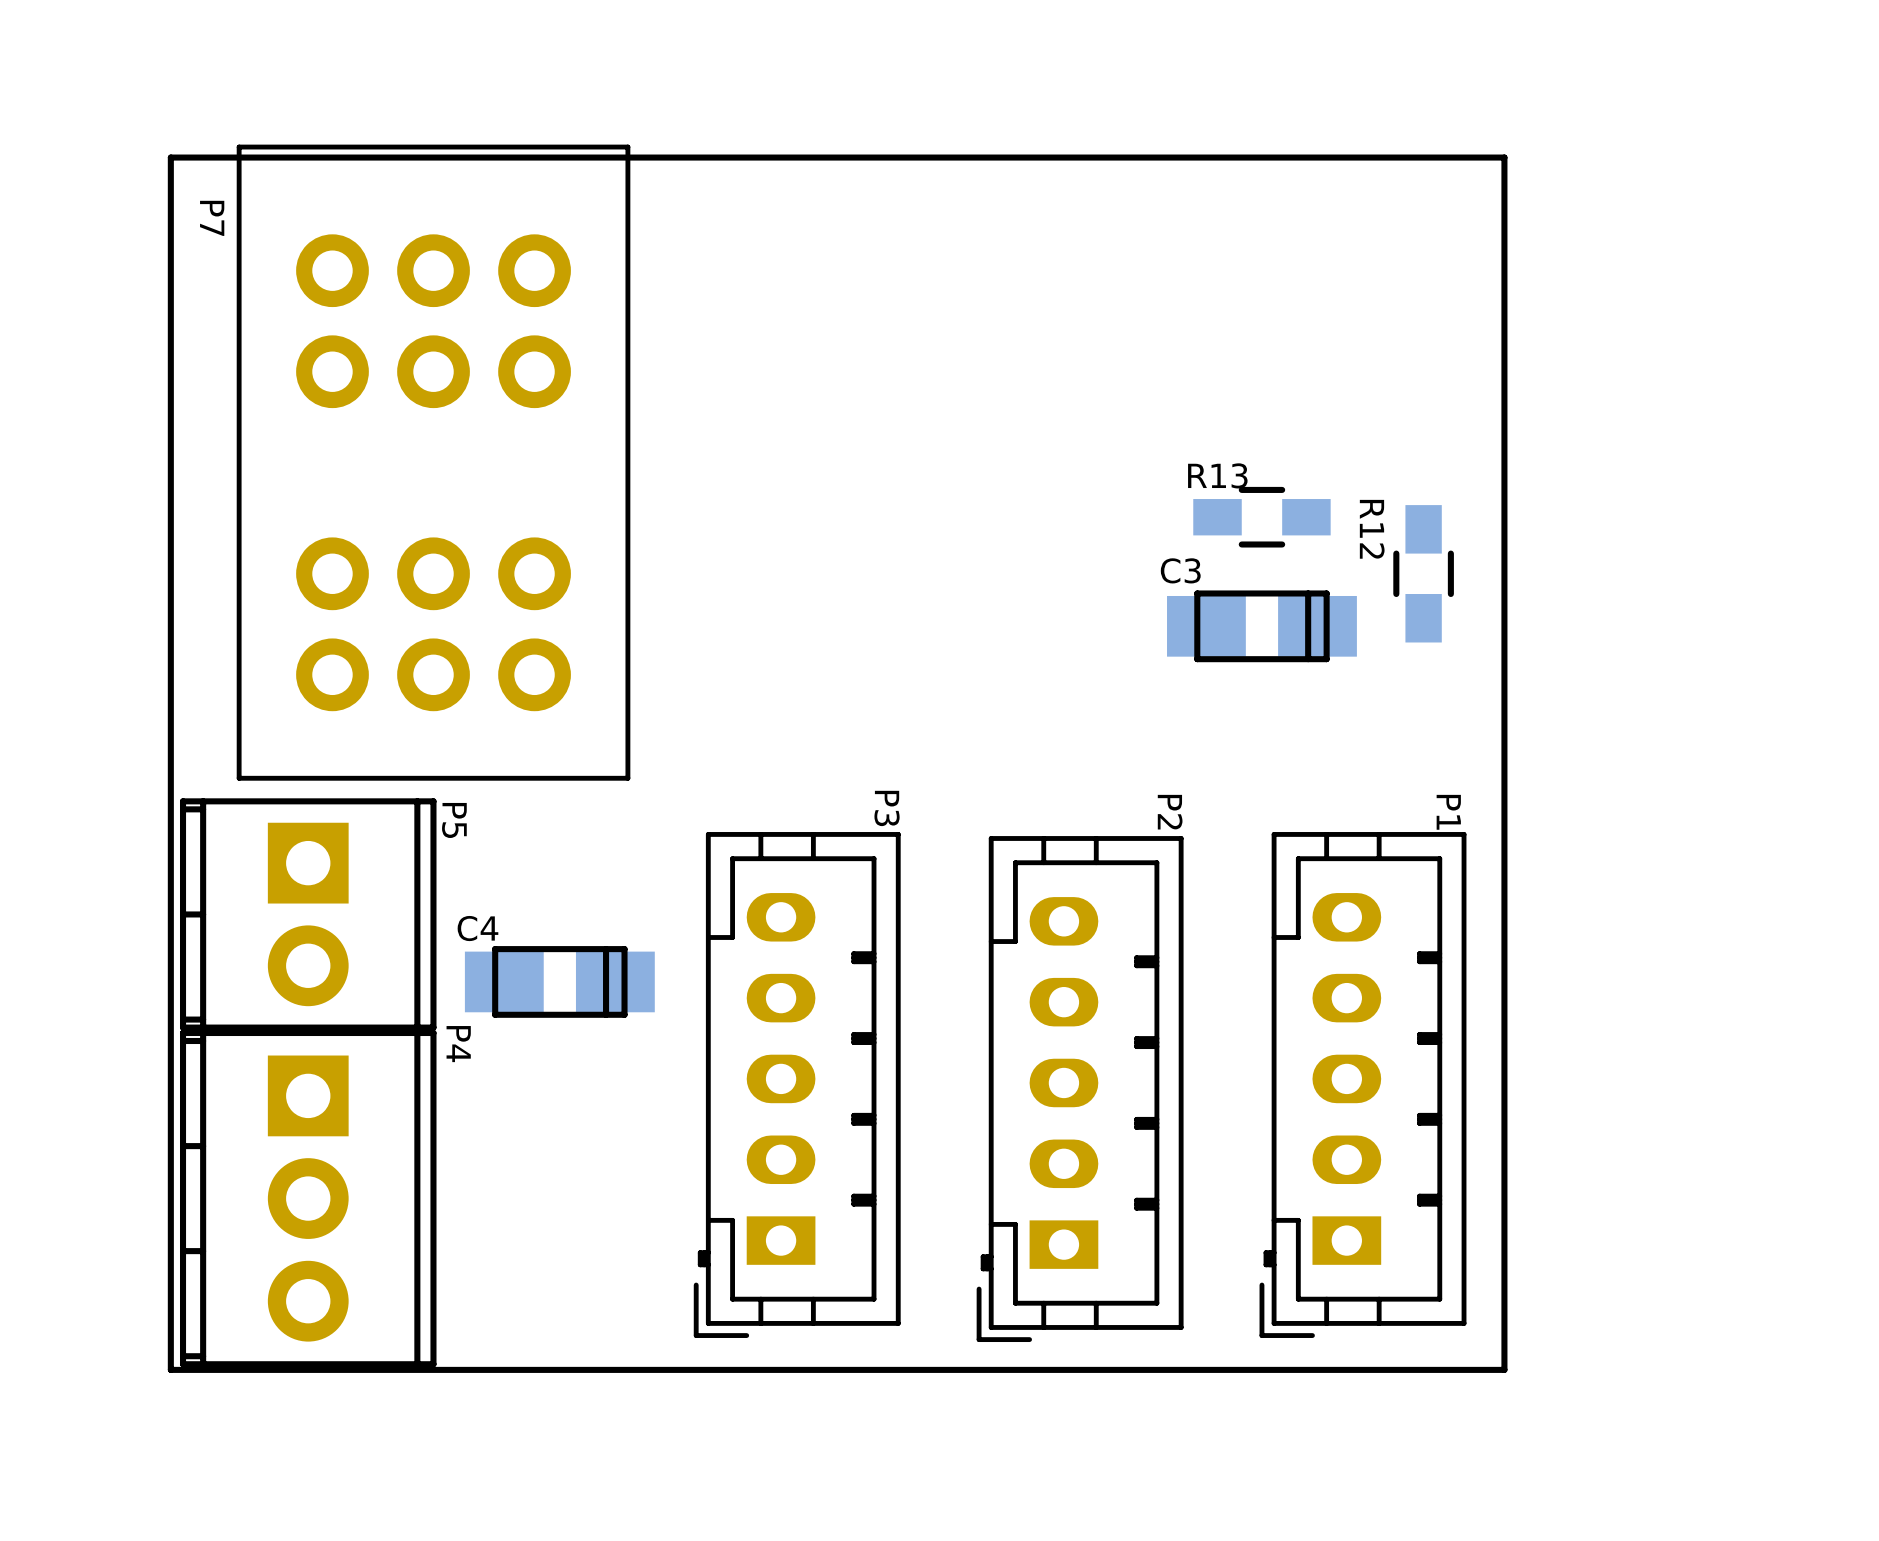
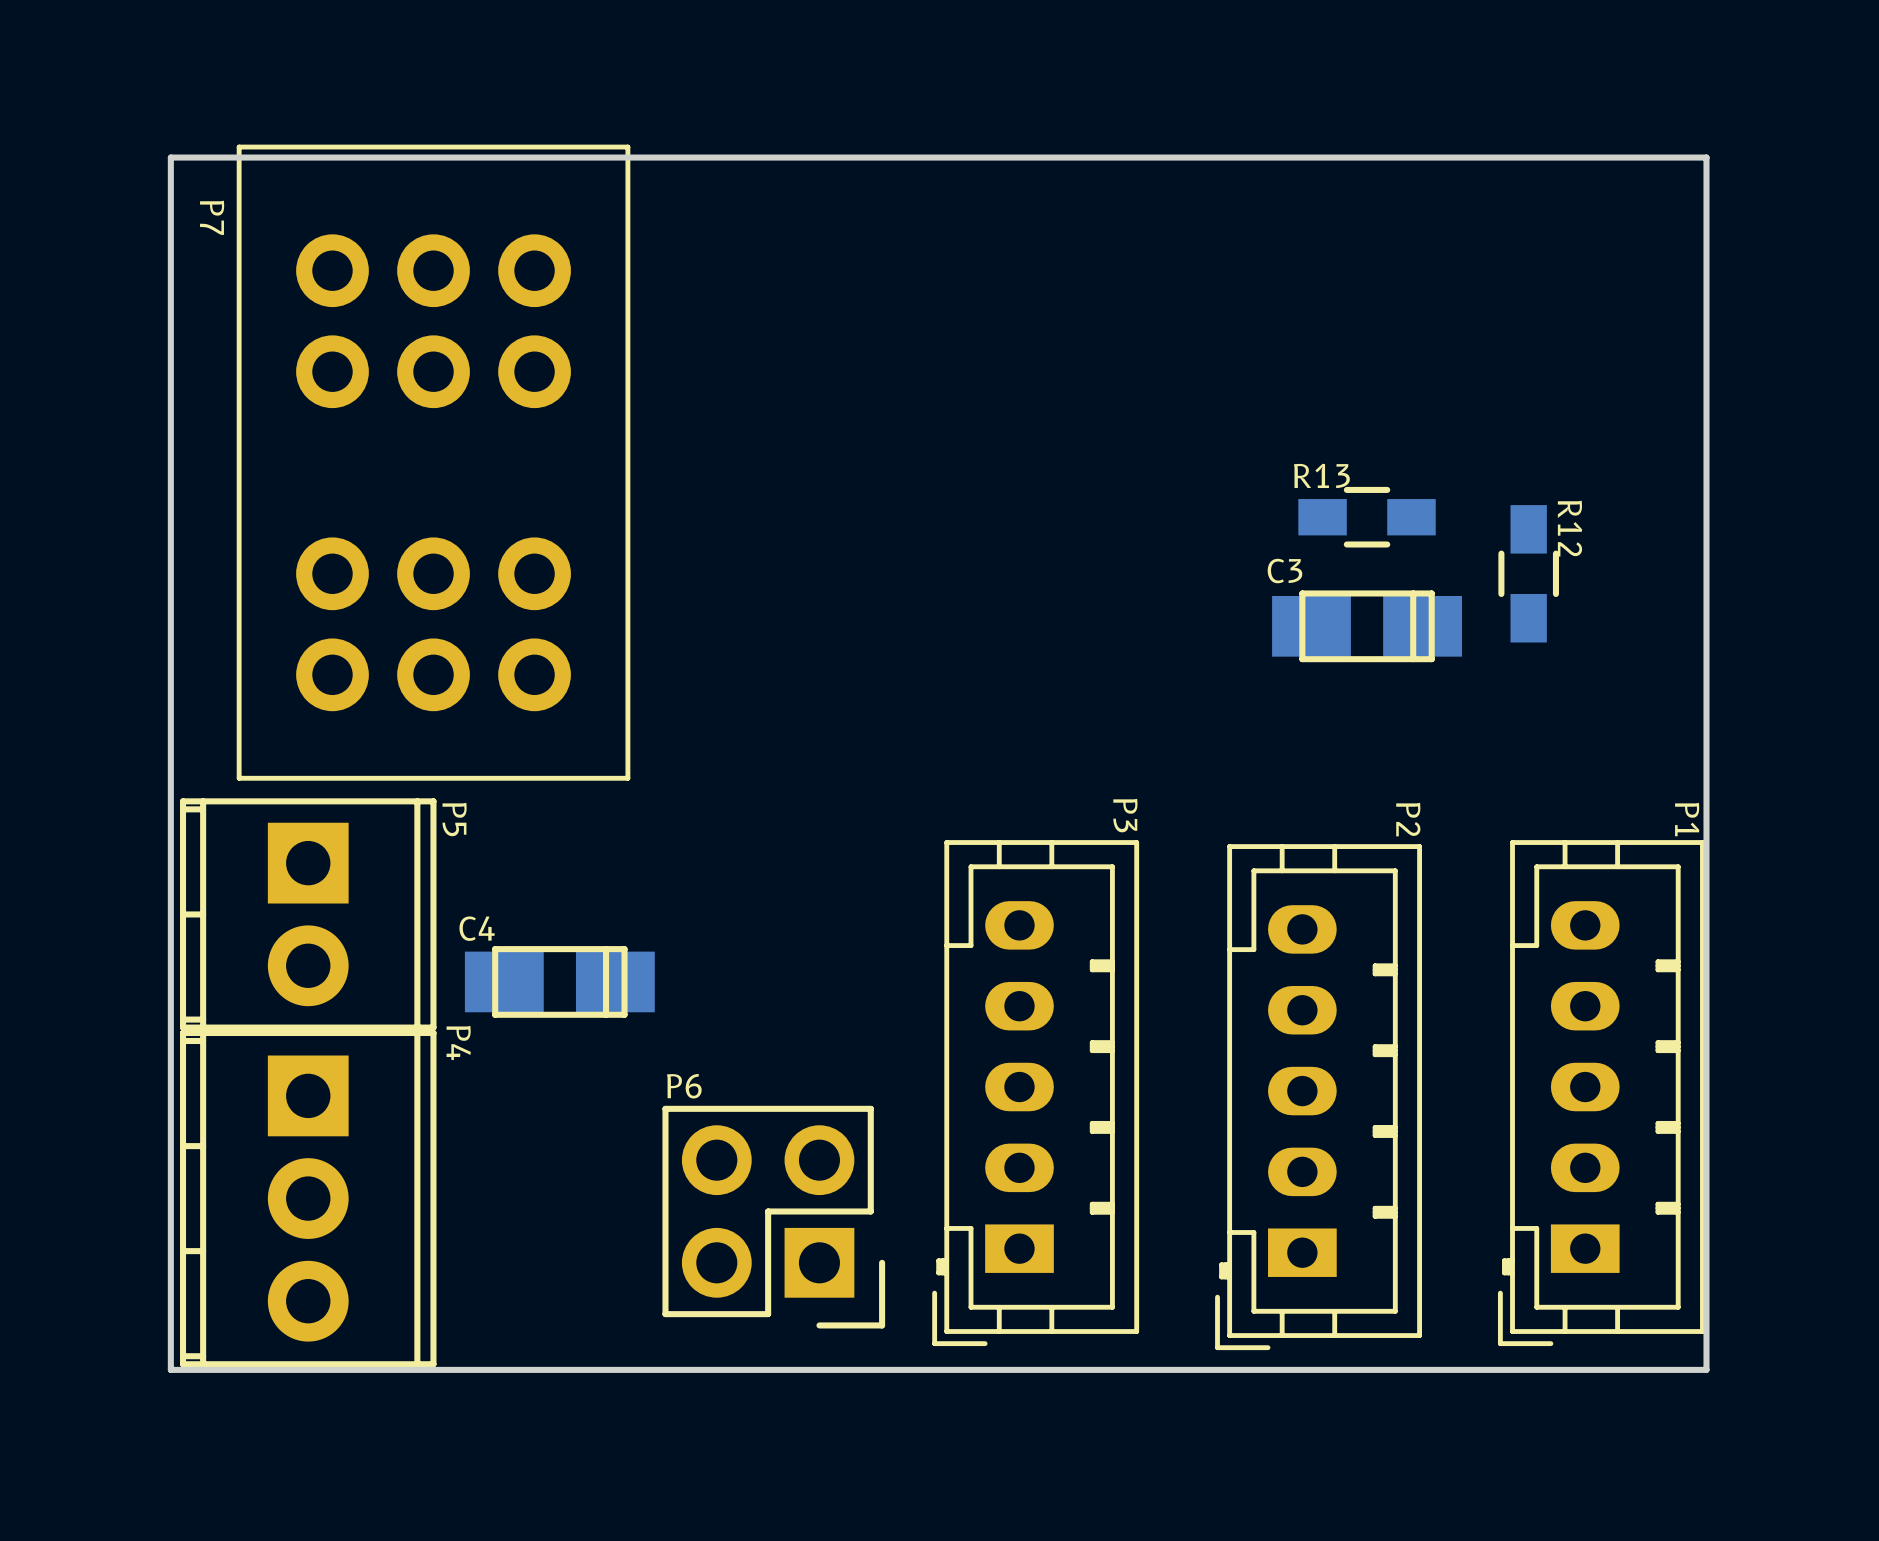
board edge: (1504, 157) (1504, 1369) -> (1504, 157) (1706, 157) (1706, 1369) (1504, 1369)
R13 position: (1261, 517) -> (1367, 517)
R12 name position: R12 (1372, 529) -> R12 (1570, 528)
R12 position: (1423, 573) -> (1528, 573)
C3 position: (1261, 626) -> (1367, 626)
P3 position: (797, 1085) -> (1035, 1093)
P1 position: (1362, 1085) -> (1601, 1093)
P2 position: (1080, 1089) -> (1318, 1097)
P6: none -> (773, 1217)

